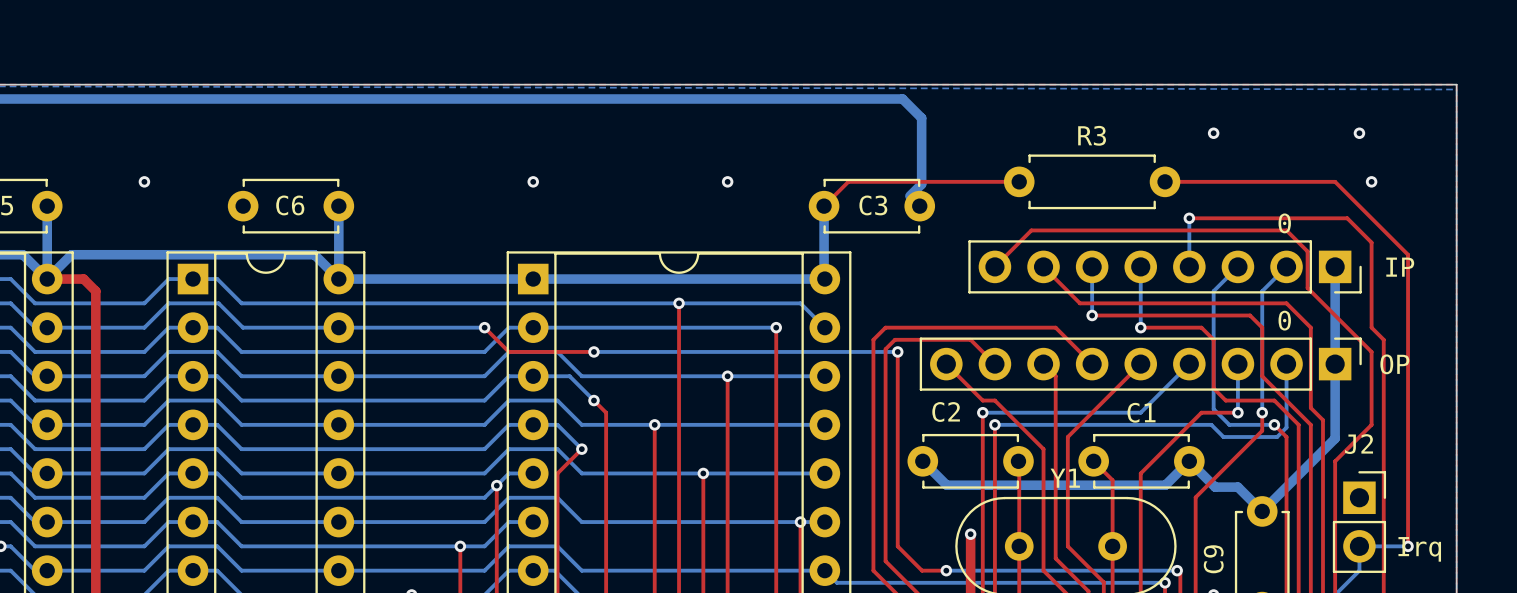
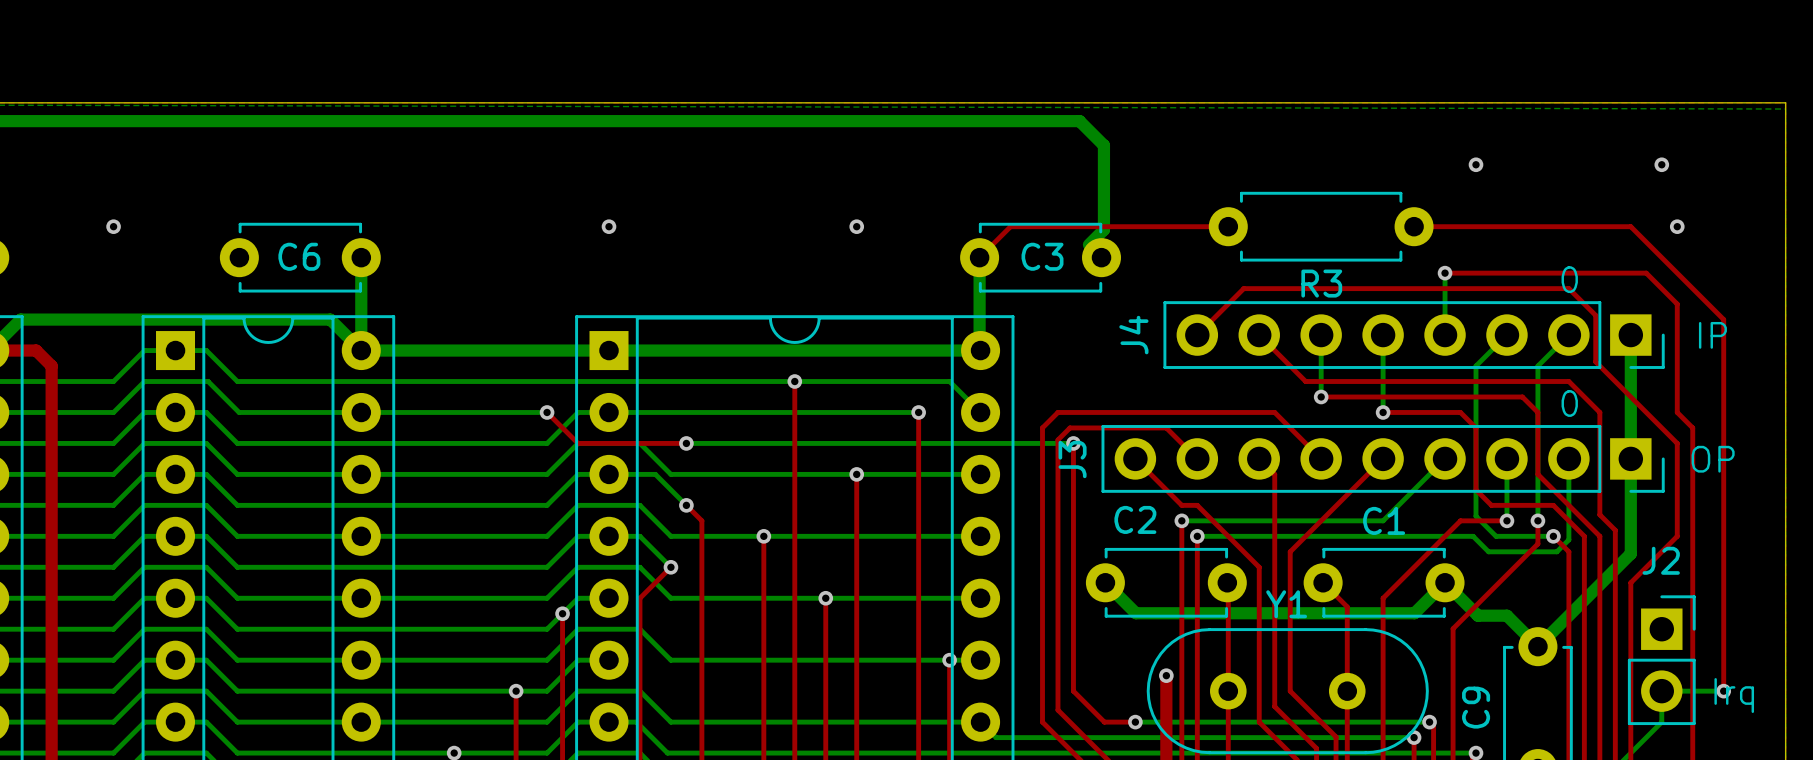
R3 name position: R3 (1092, 135) -> R3 (1321, 283)
J4 name: none -> J4 (1133, 335)
part: (1140, 364) -> none
J3: none -> (1383, 458)

